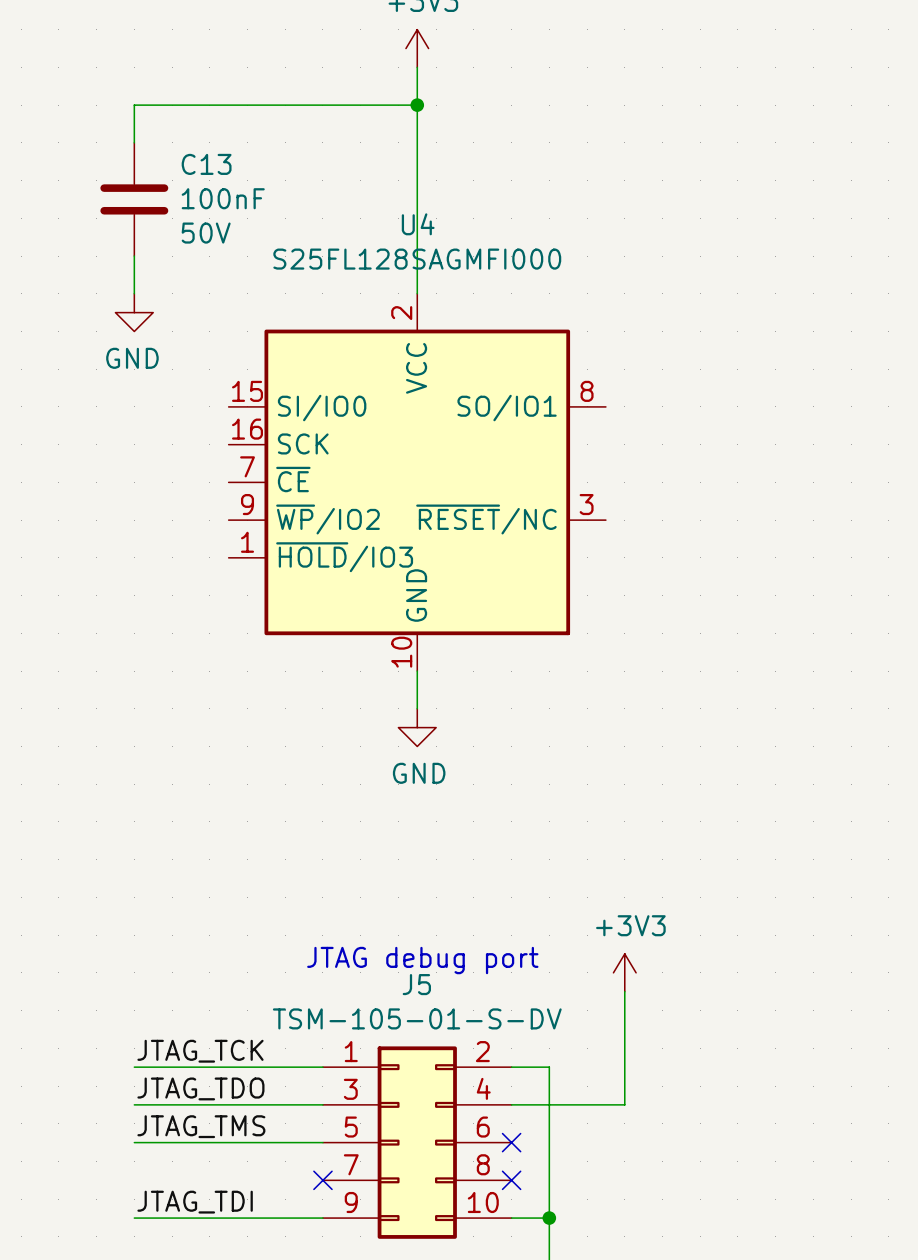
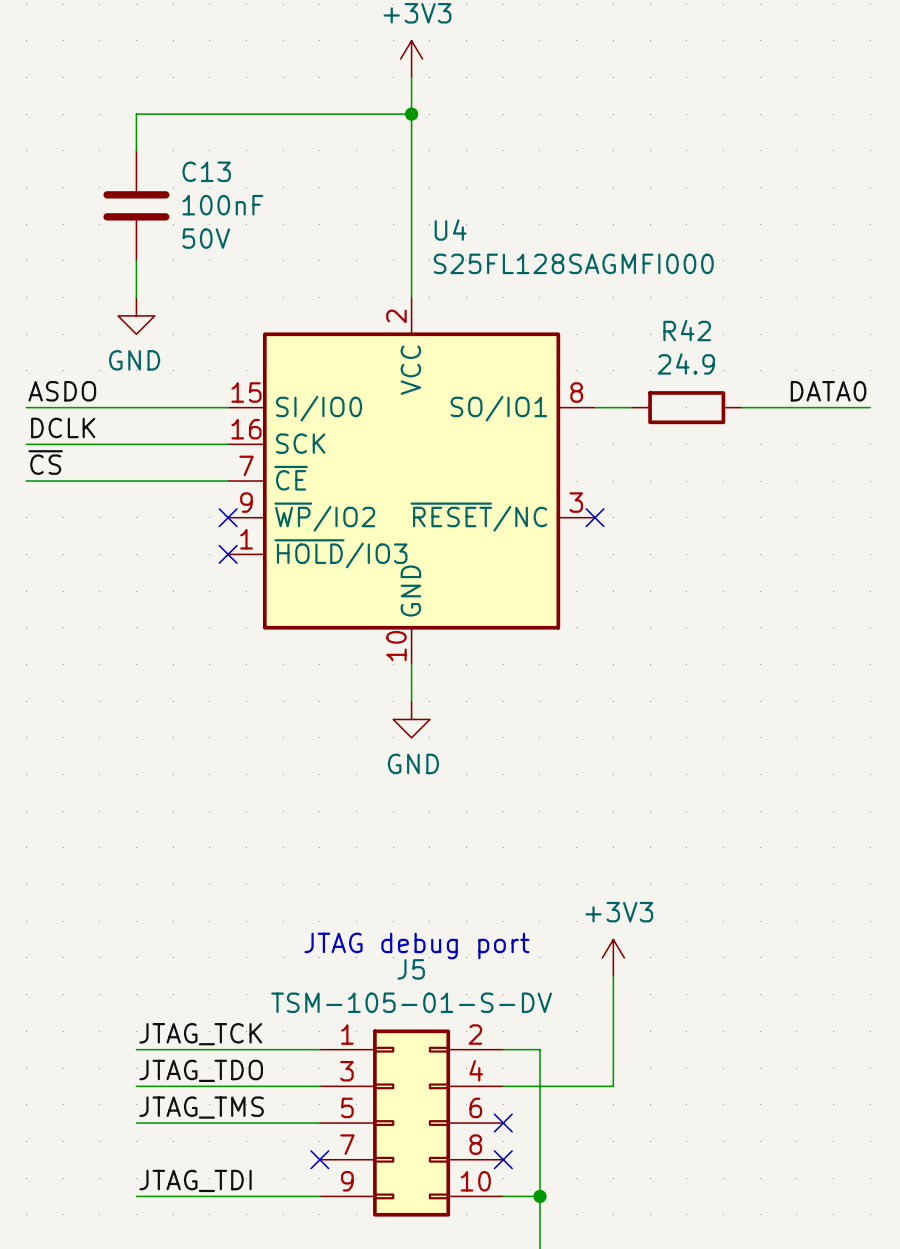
U4 name position: U4 (418, 224) -> U4 (450, 230)
U4 value position: S25FL128SAGMFI000 (417, 259) -> S25FL128SAGMFI000 (573, 263)
label: none -> ASDO (62, 391)
label: none -> DATA0 (828, 391)
wire: none -> (26, 407) (228, 407)
wire: none -> (595, 407) (631, 407)
R42: none -> 24.9 (686, 407)
wire: none -> (741, 407) (870, 407)
label: none -> DCLK (63, 427)
wire: none -> (26, 444) (228, 444)
label: none -> ~{CS} (45, 462)
wire: none -> (26, 481) (228, 481)
no-connect mark: none -> (228, 517)
no-connect mark: none -> (595, 517)
no-connect mark: none -> (228, 554)

